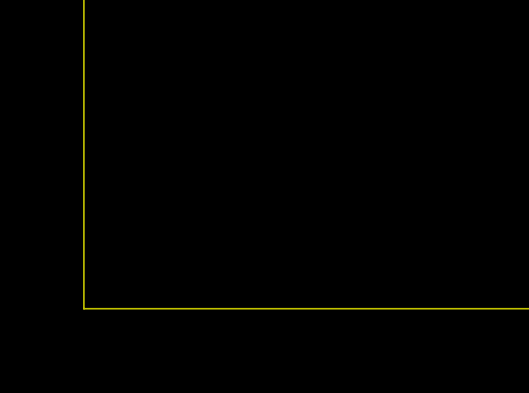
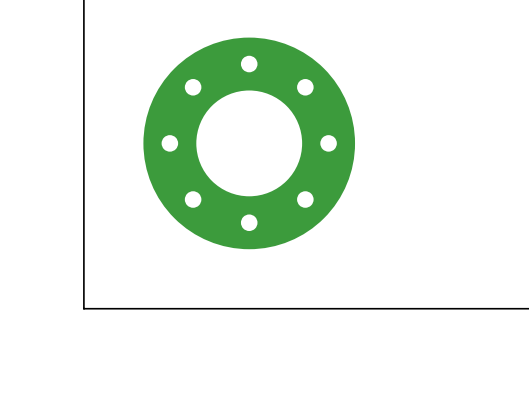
part: none -> (249, 143)

